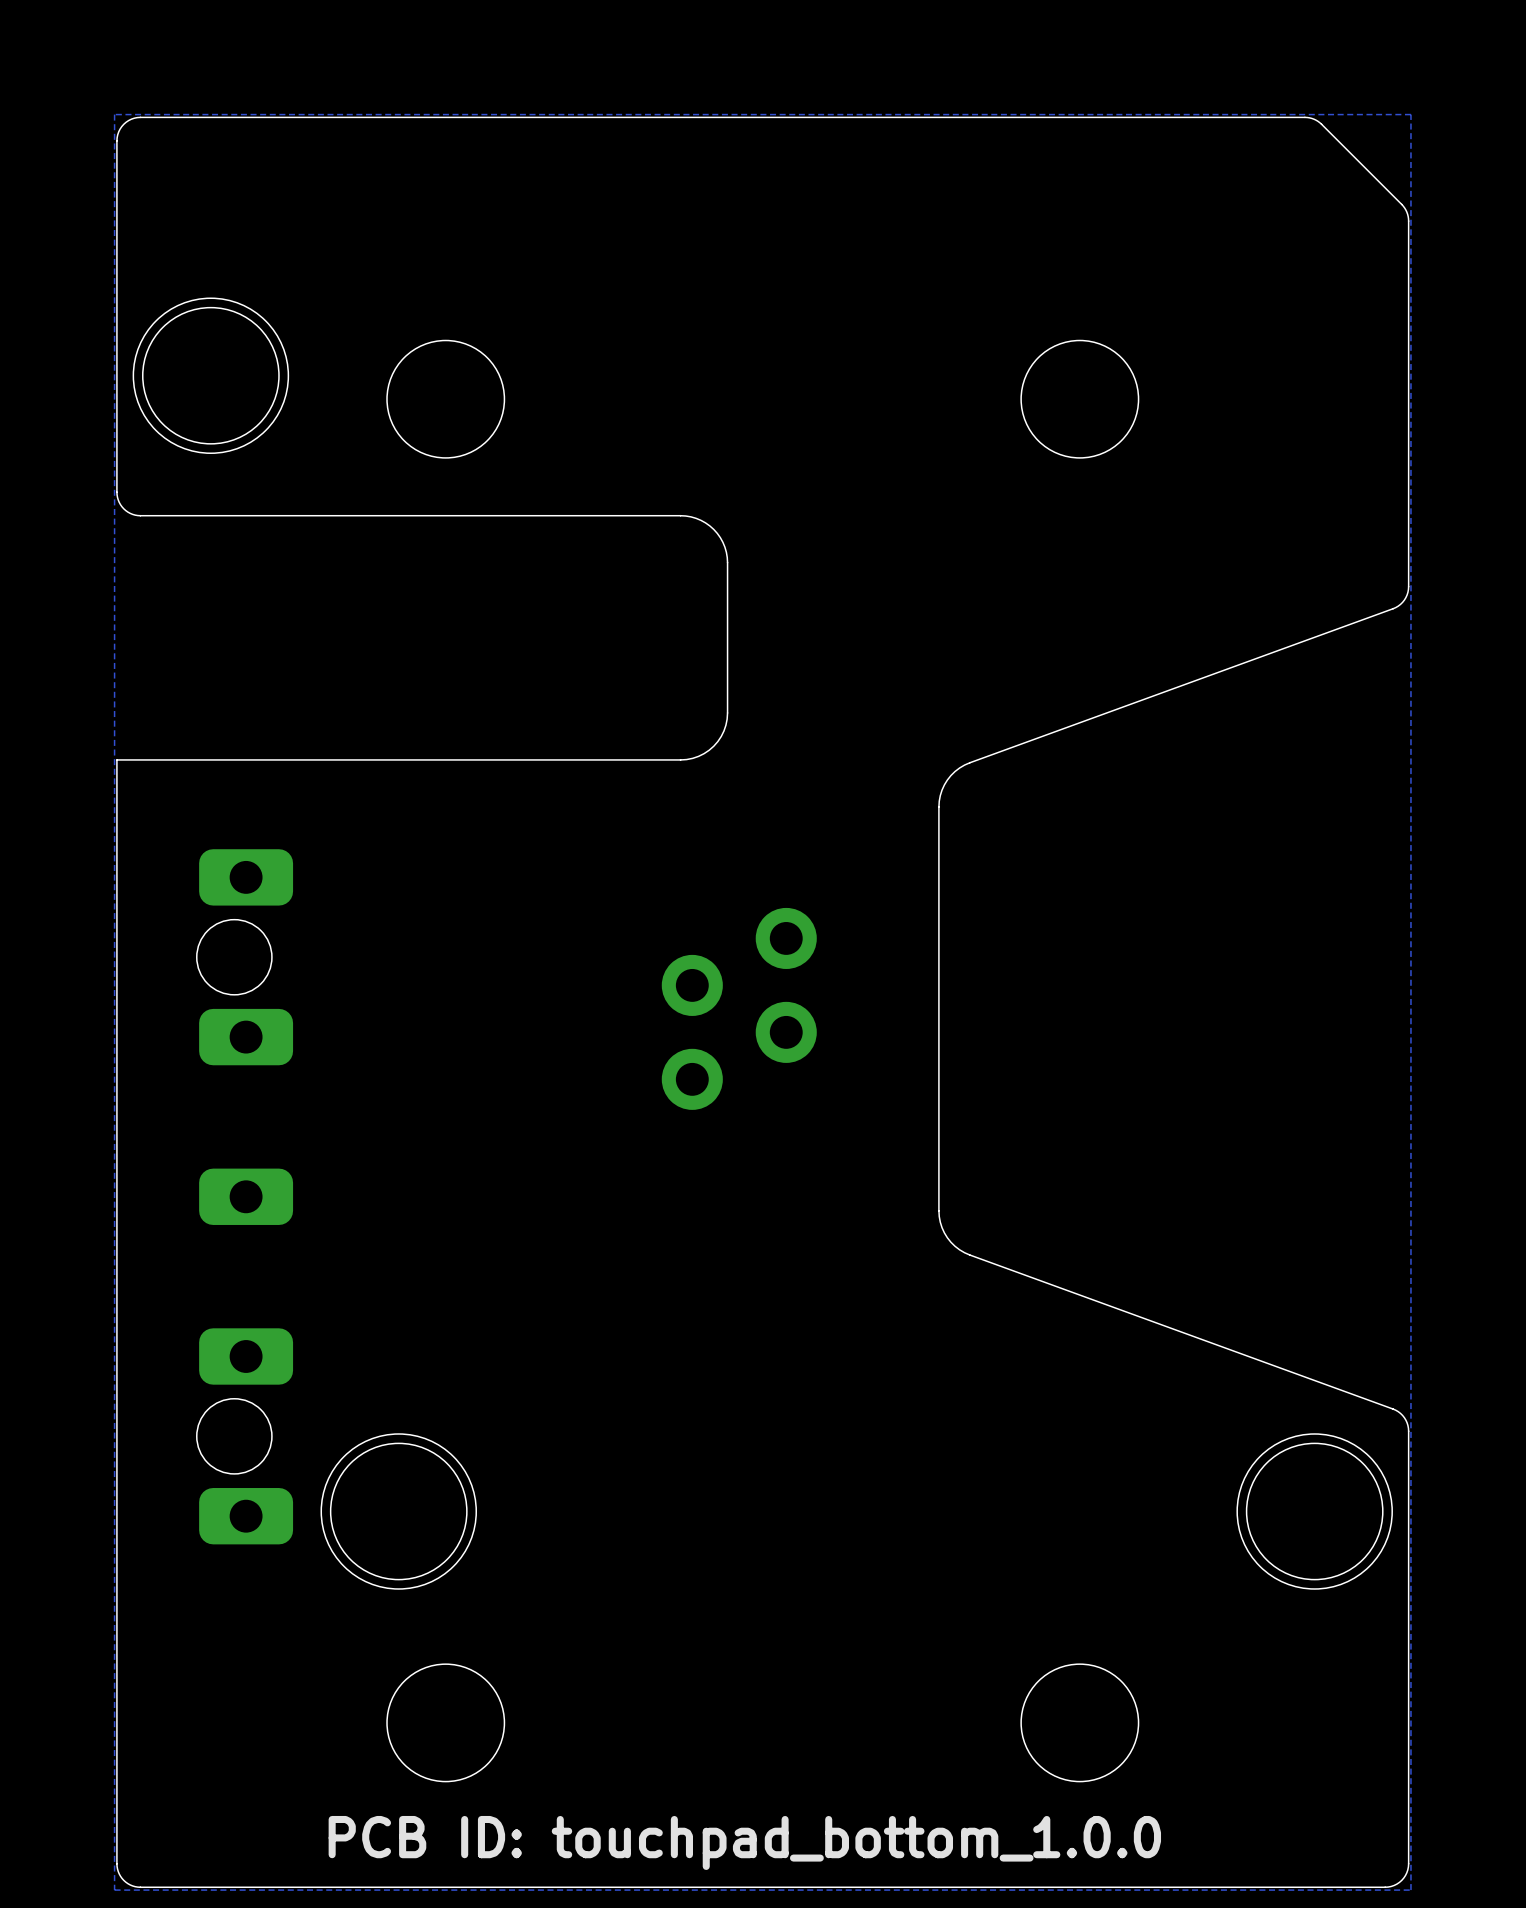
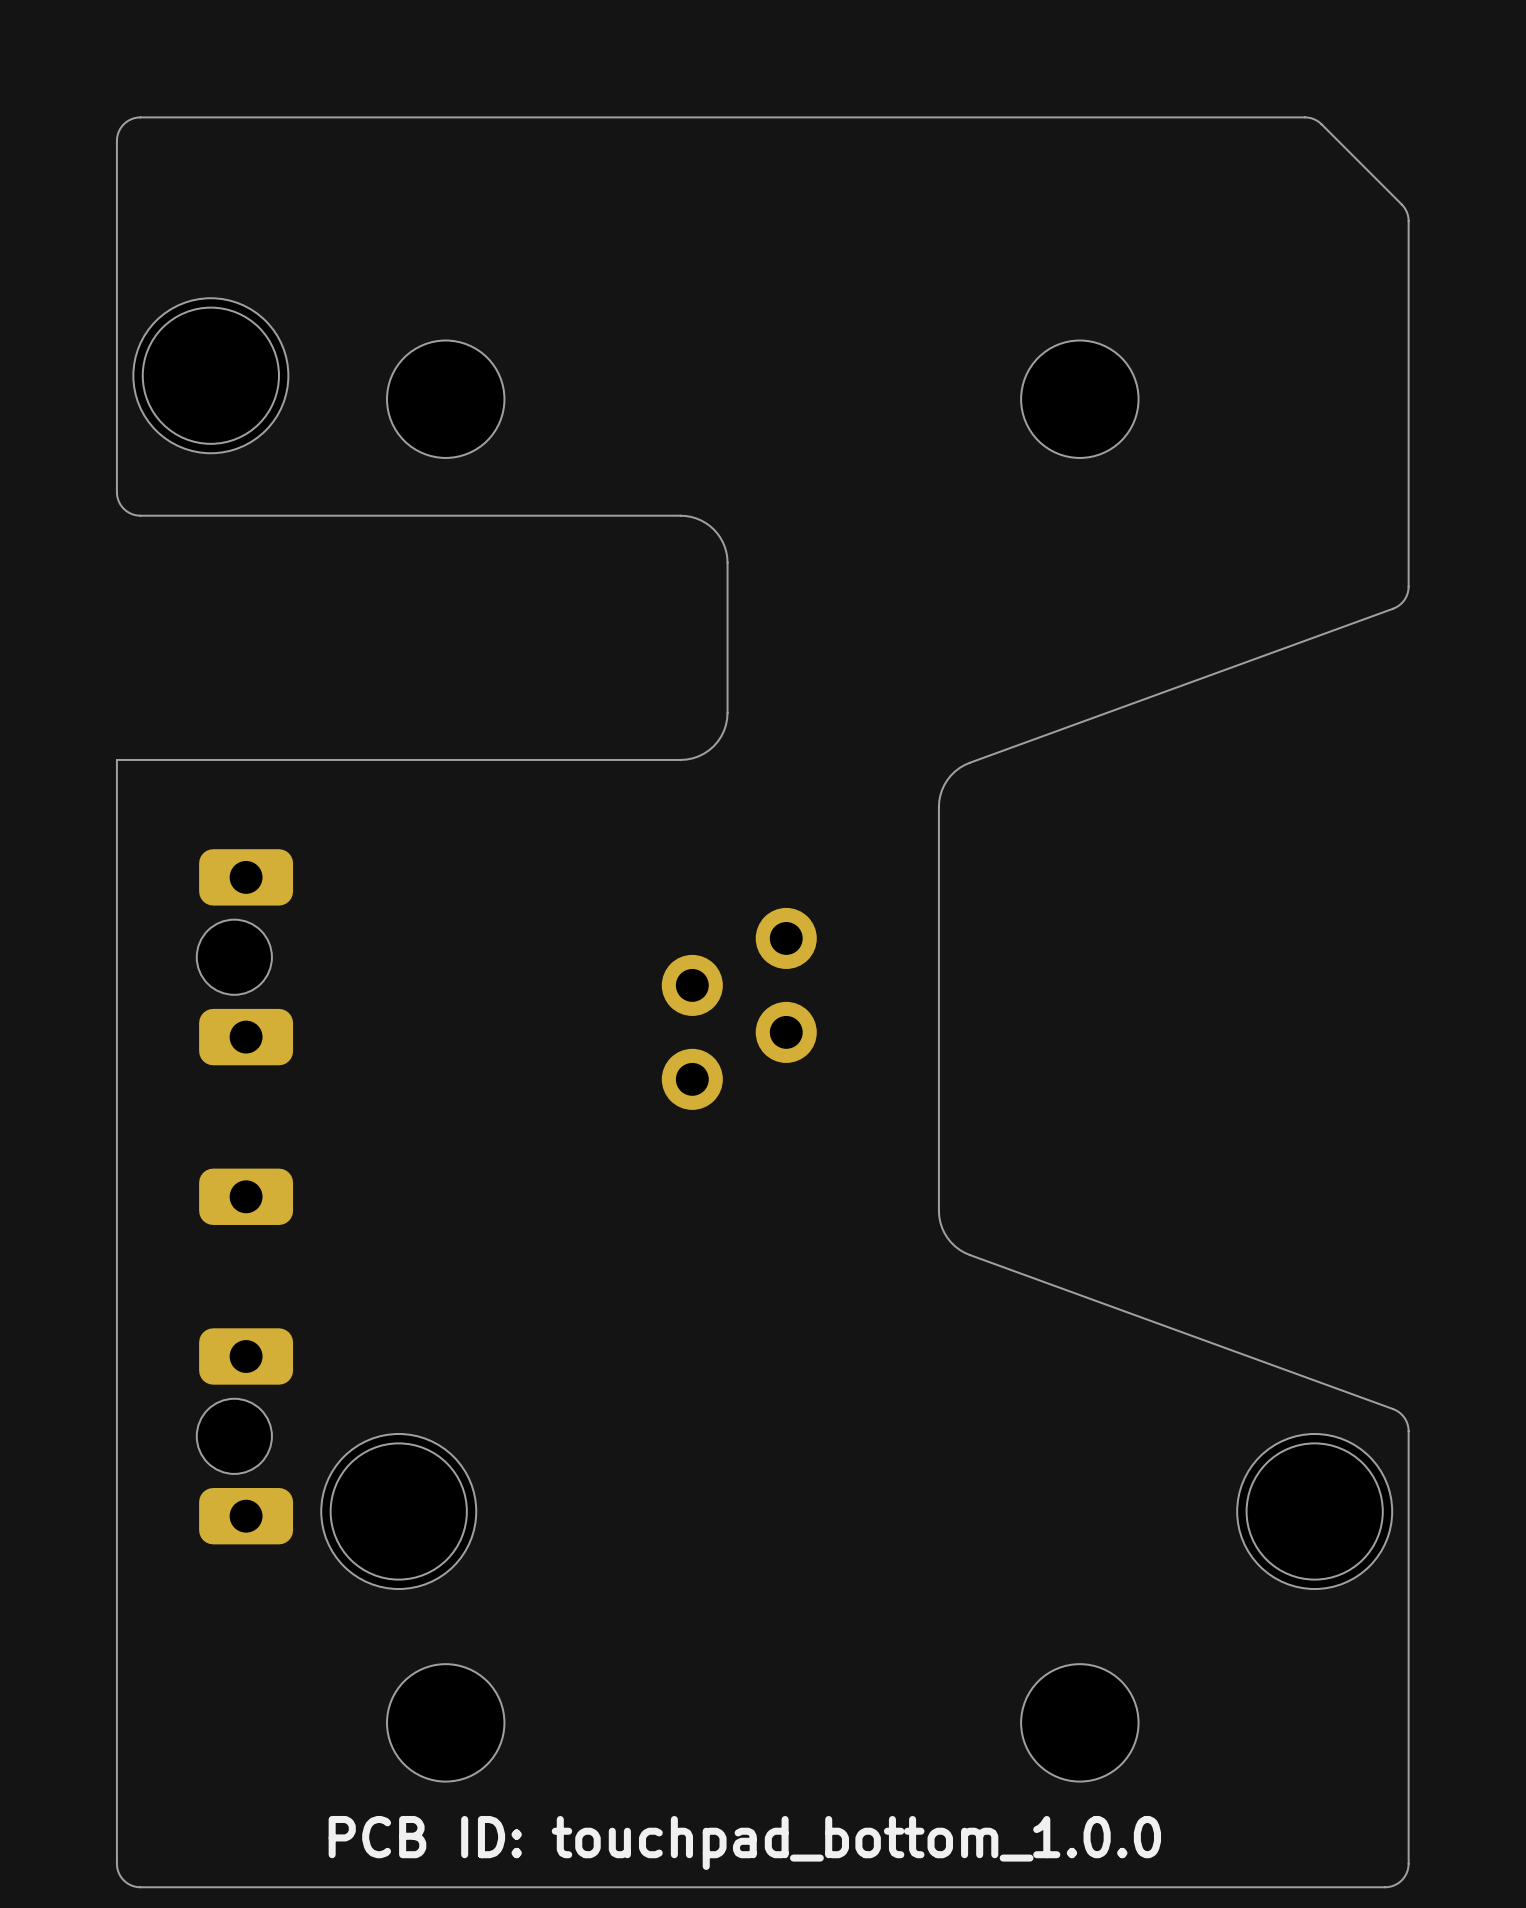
zone outline: (1410, 114) (114, 114) (114, 1890) (1410, 1890) (1410, 114) -> none

